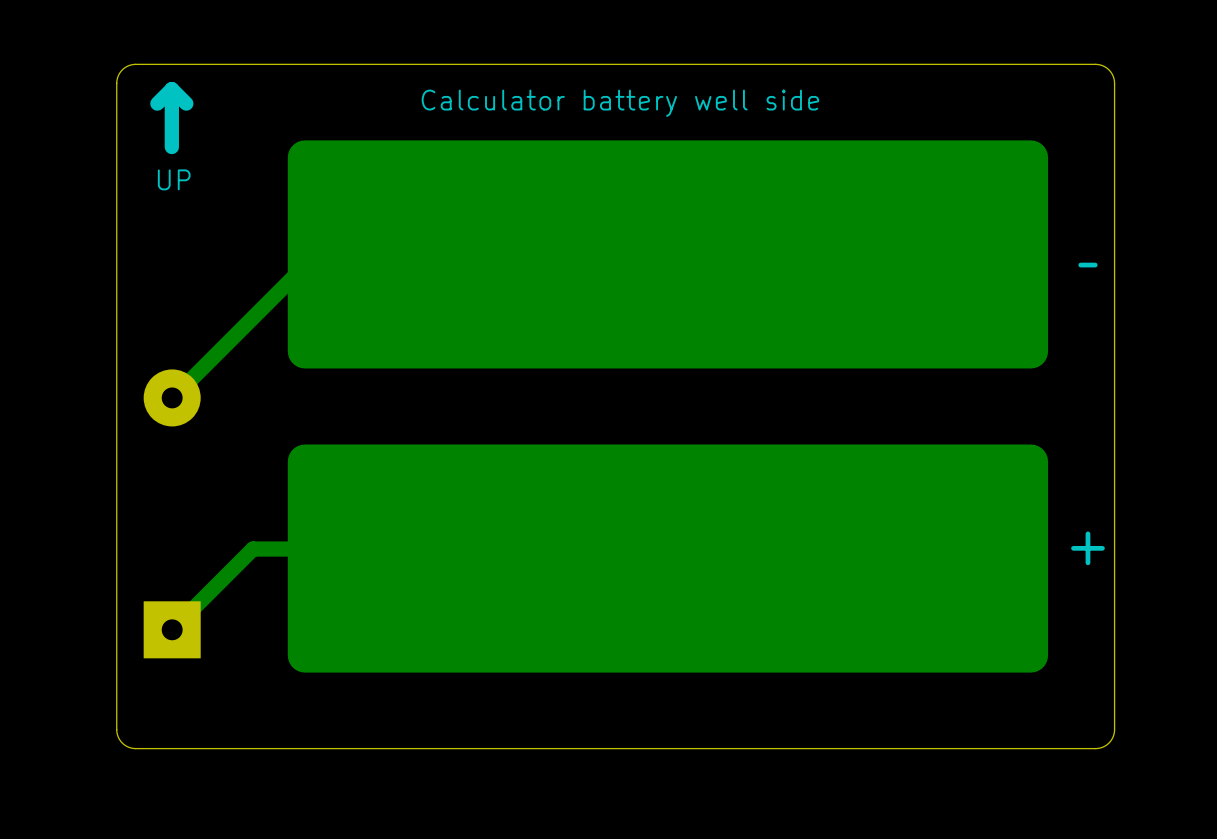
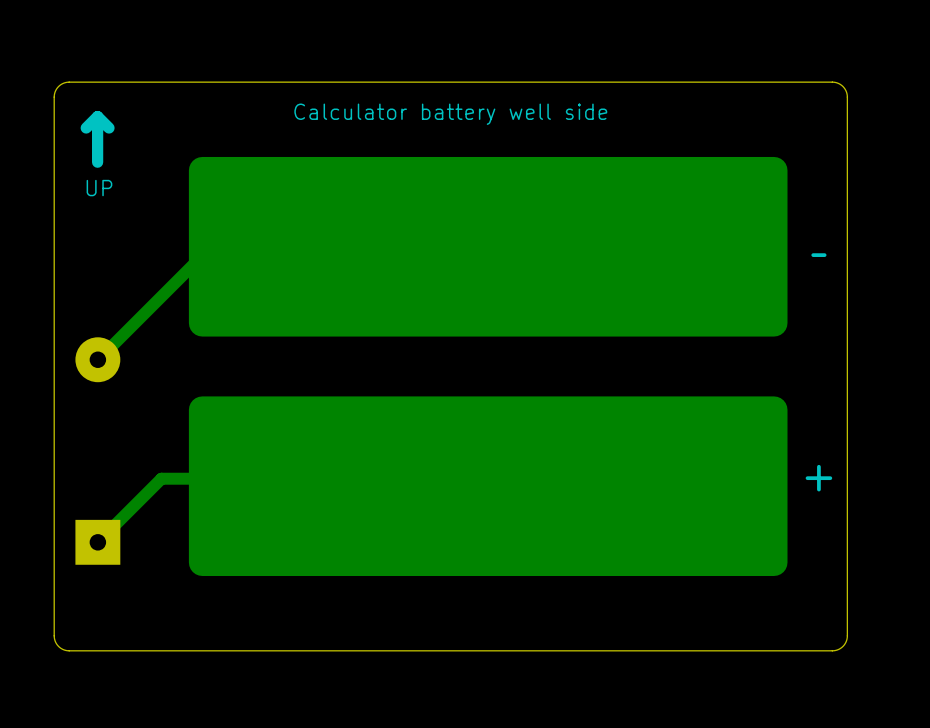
board edge: (116, 83) (122, 69) (135, 64) (1095, 64) (1109, 69) (1114, 83) (1114, 729) (1111, 739) (1105, 745) (1095, 748) (135, 748) (122, 743) (116, 729) -> (54, 112) (55, 90) (61, 84) (69, 82) (832, 82) (842, 86) (847, 97) (847, 635) (845, 643) (840, 648) (832, 650) (69, 650) (61, 648) (55, 642) (54, 620)
text position: Calculator battery well side (620, 103) -> Calculator battery well side (450, 114)

